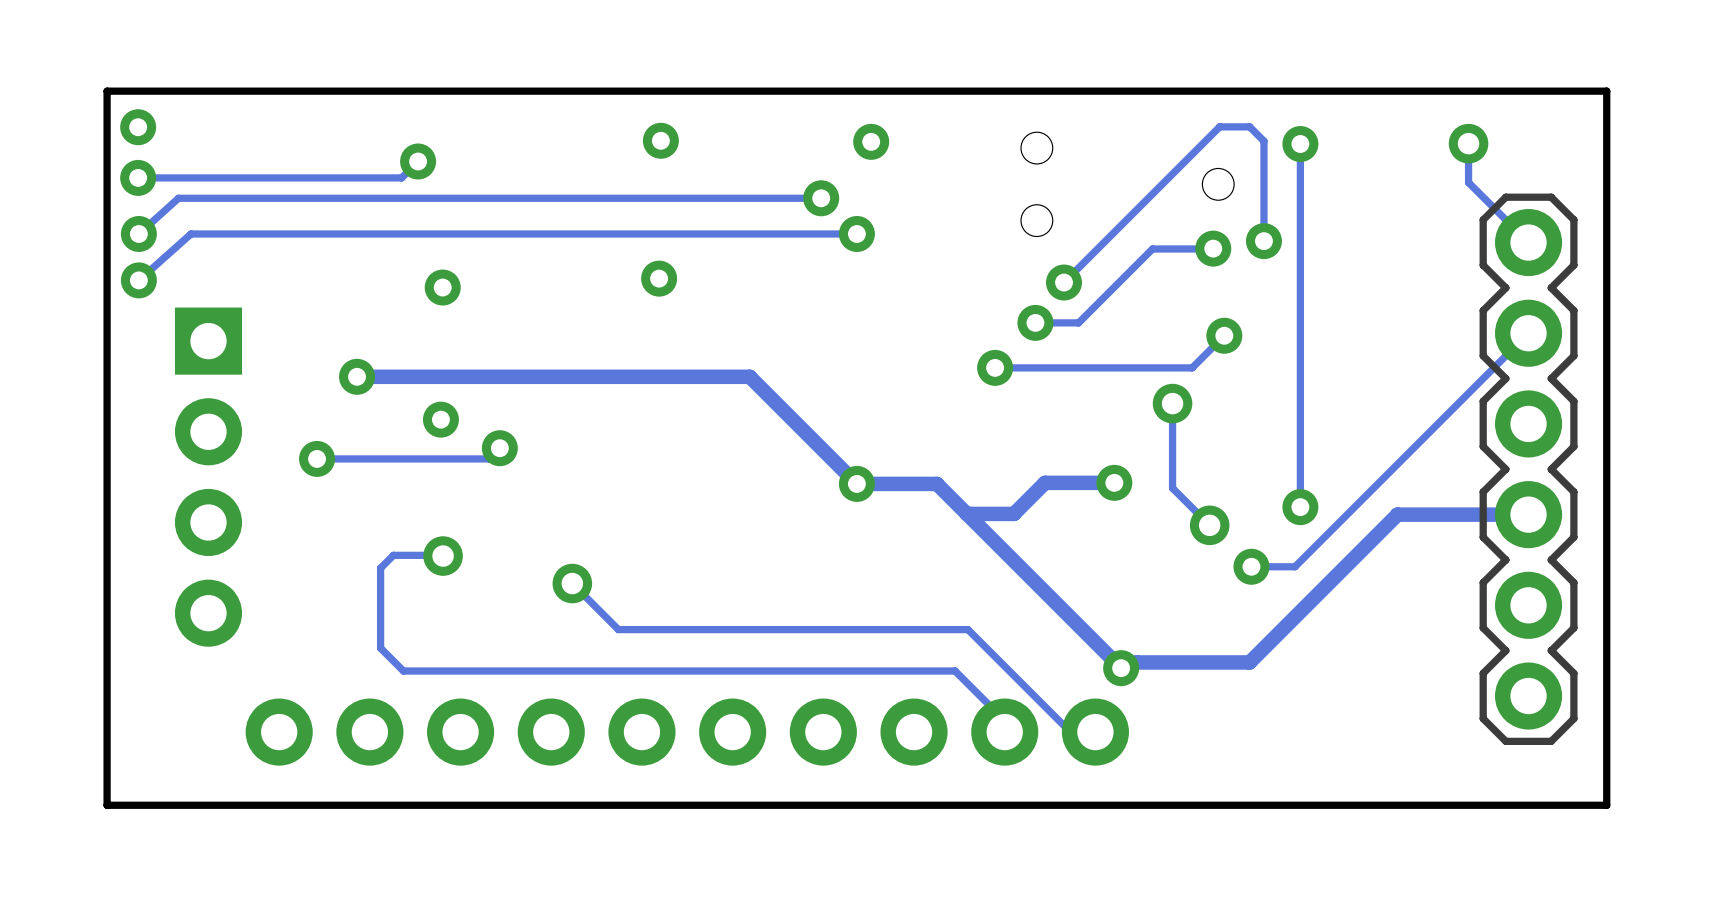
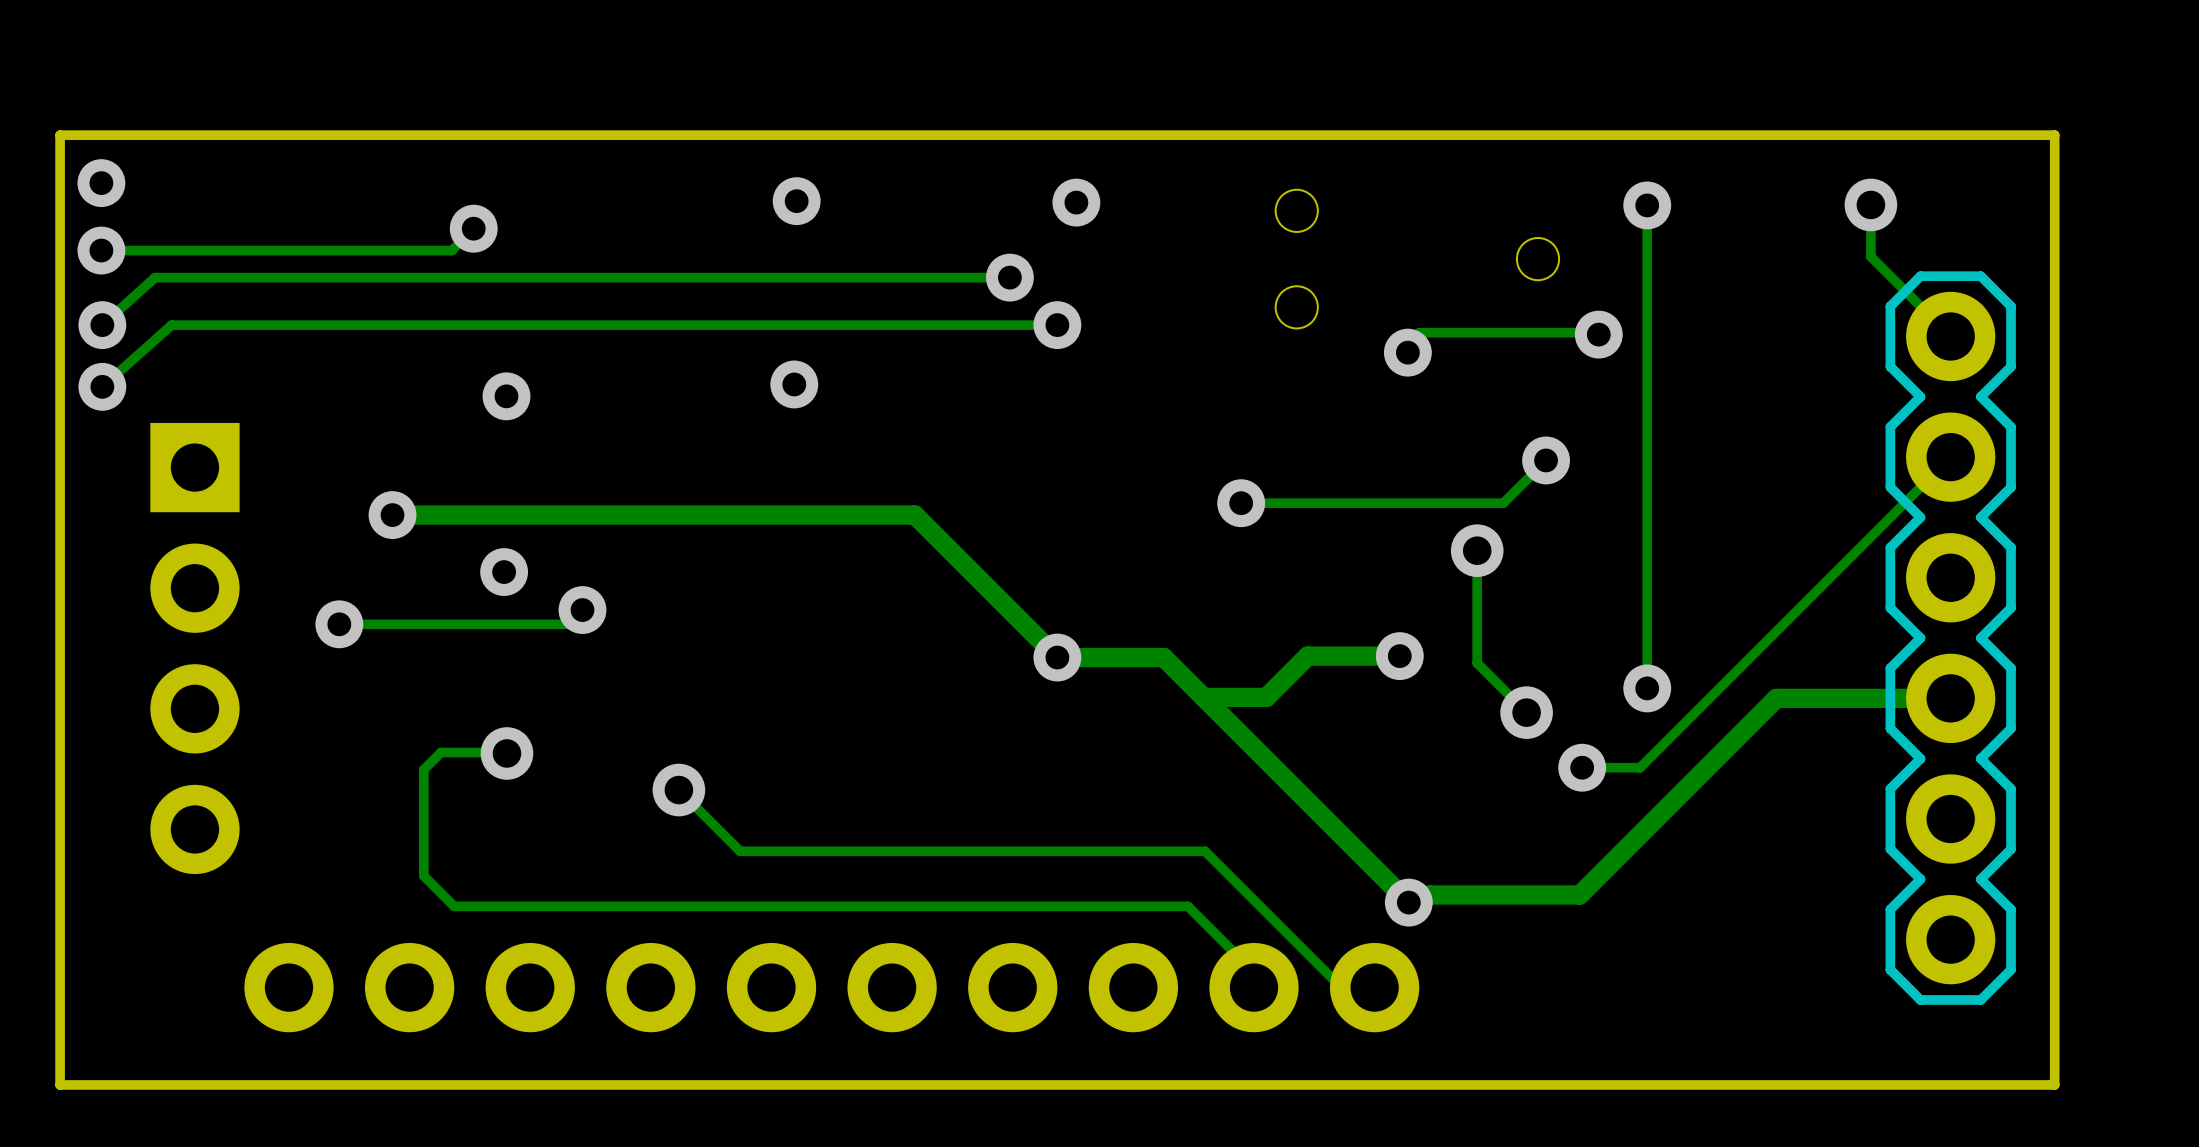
track: none -> (1596, 332) (1419, 332) (1407, 352)
track: (1263, 241) (1263, 141) (1249, 126) (1219, 126) (1064, 282) -> none
track: (1212, 248) (1152, 248) (1078, 322) (1035, 322) -> none
via: (1213, 248) -> none
via: none -> (1407, 352)
via: (1064, 282) -> none
via: (1035, 322) -> none

